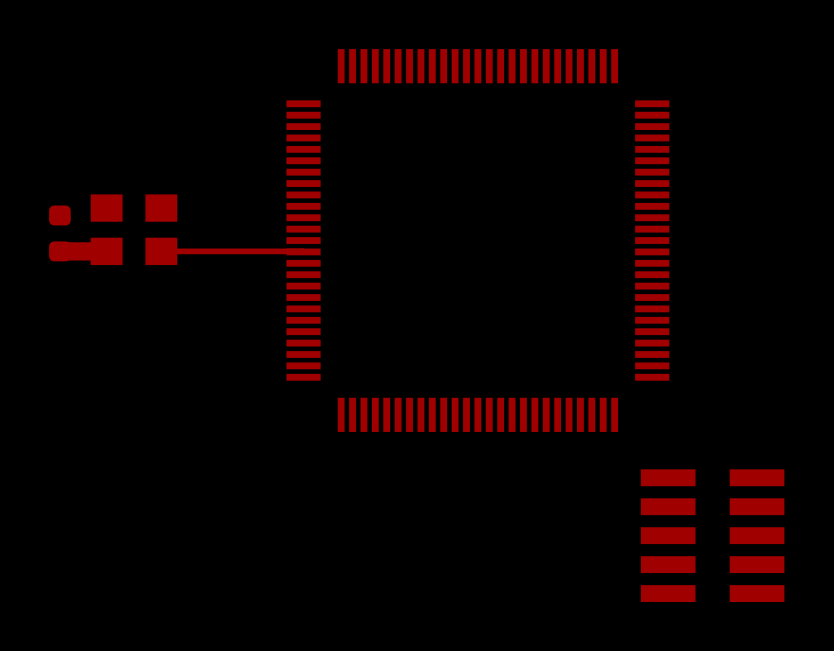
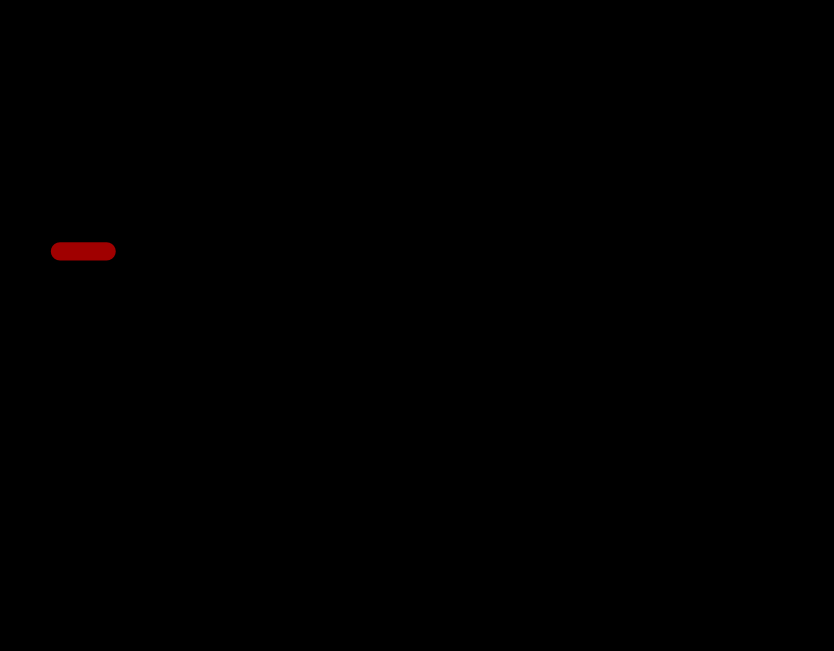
part: (133, 229) -> none
part: (59, 233) -> none
part: (477, 240) -> none
top track: (161, 251) (303, 251) -> none
part: (712, 535) -> none

